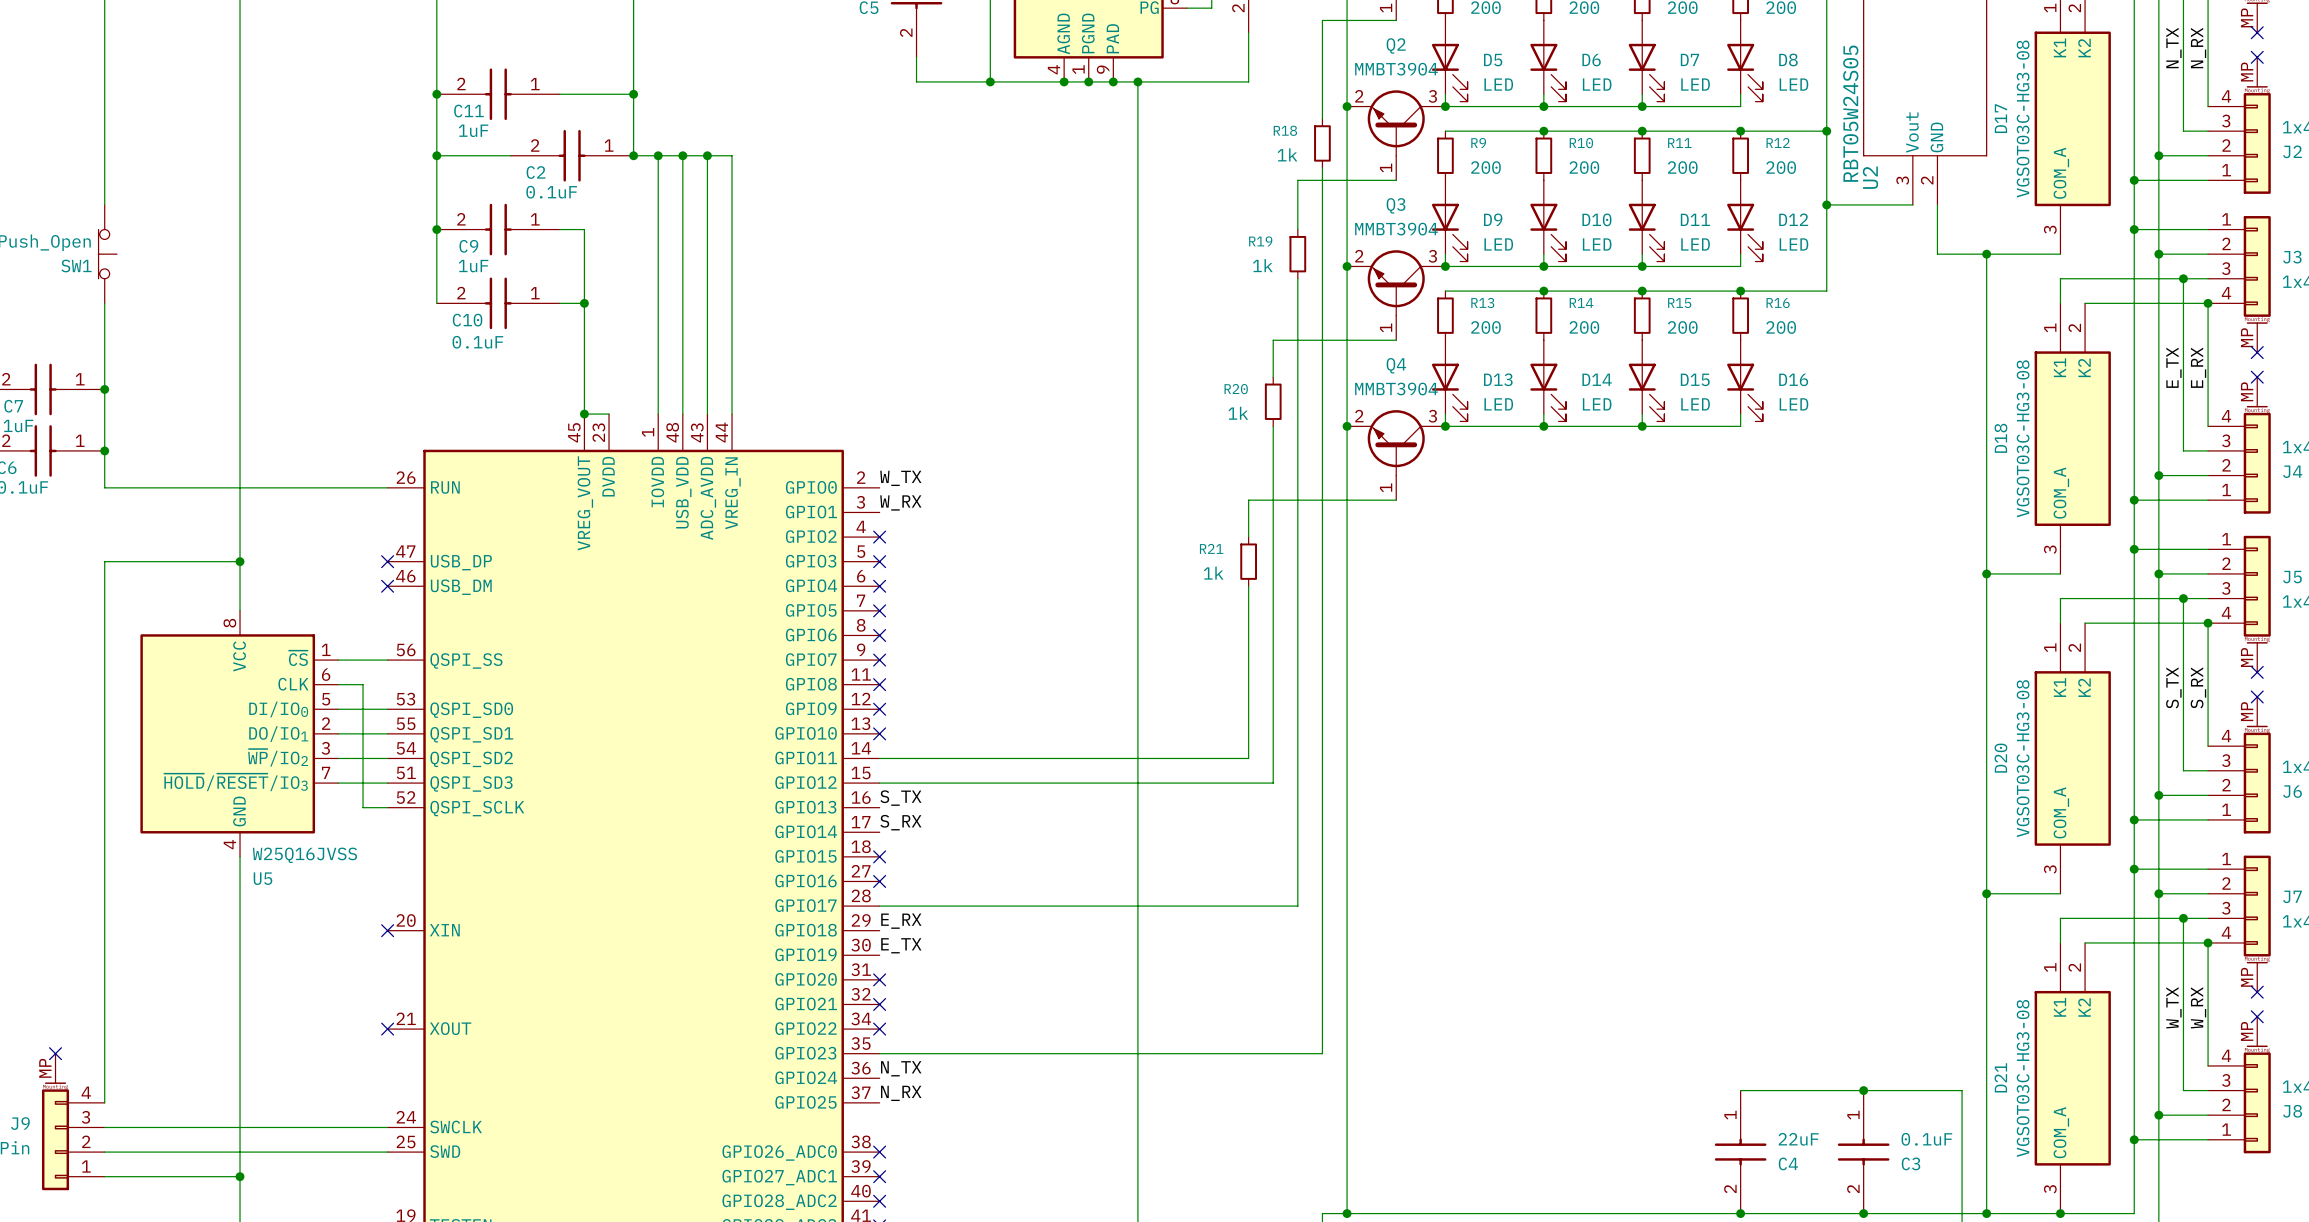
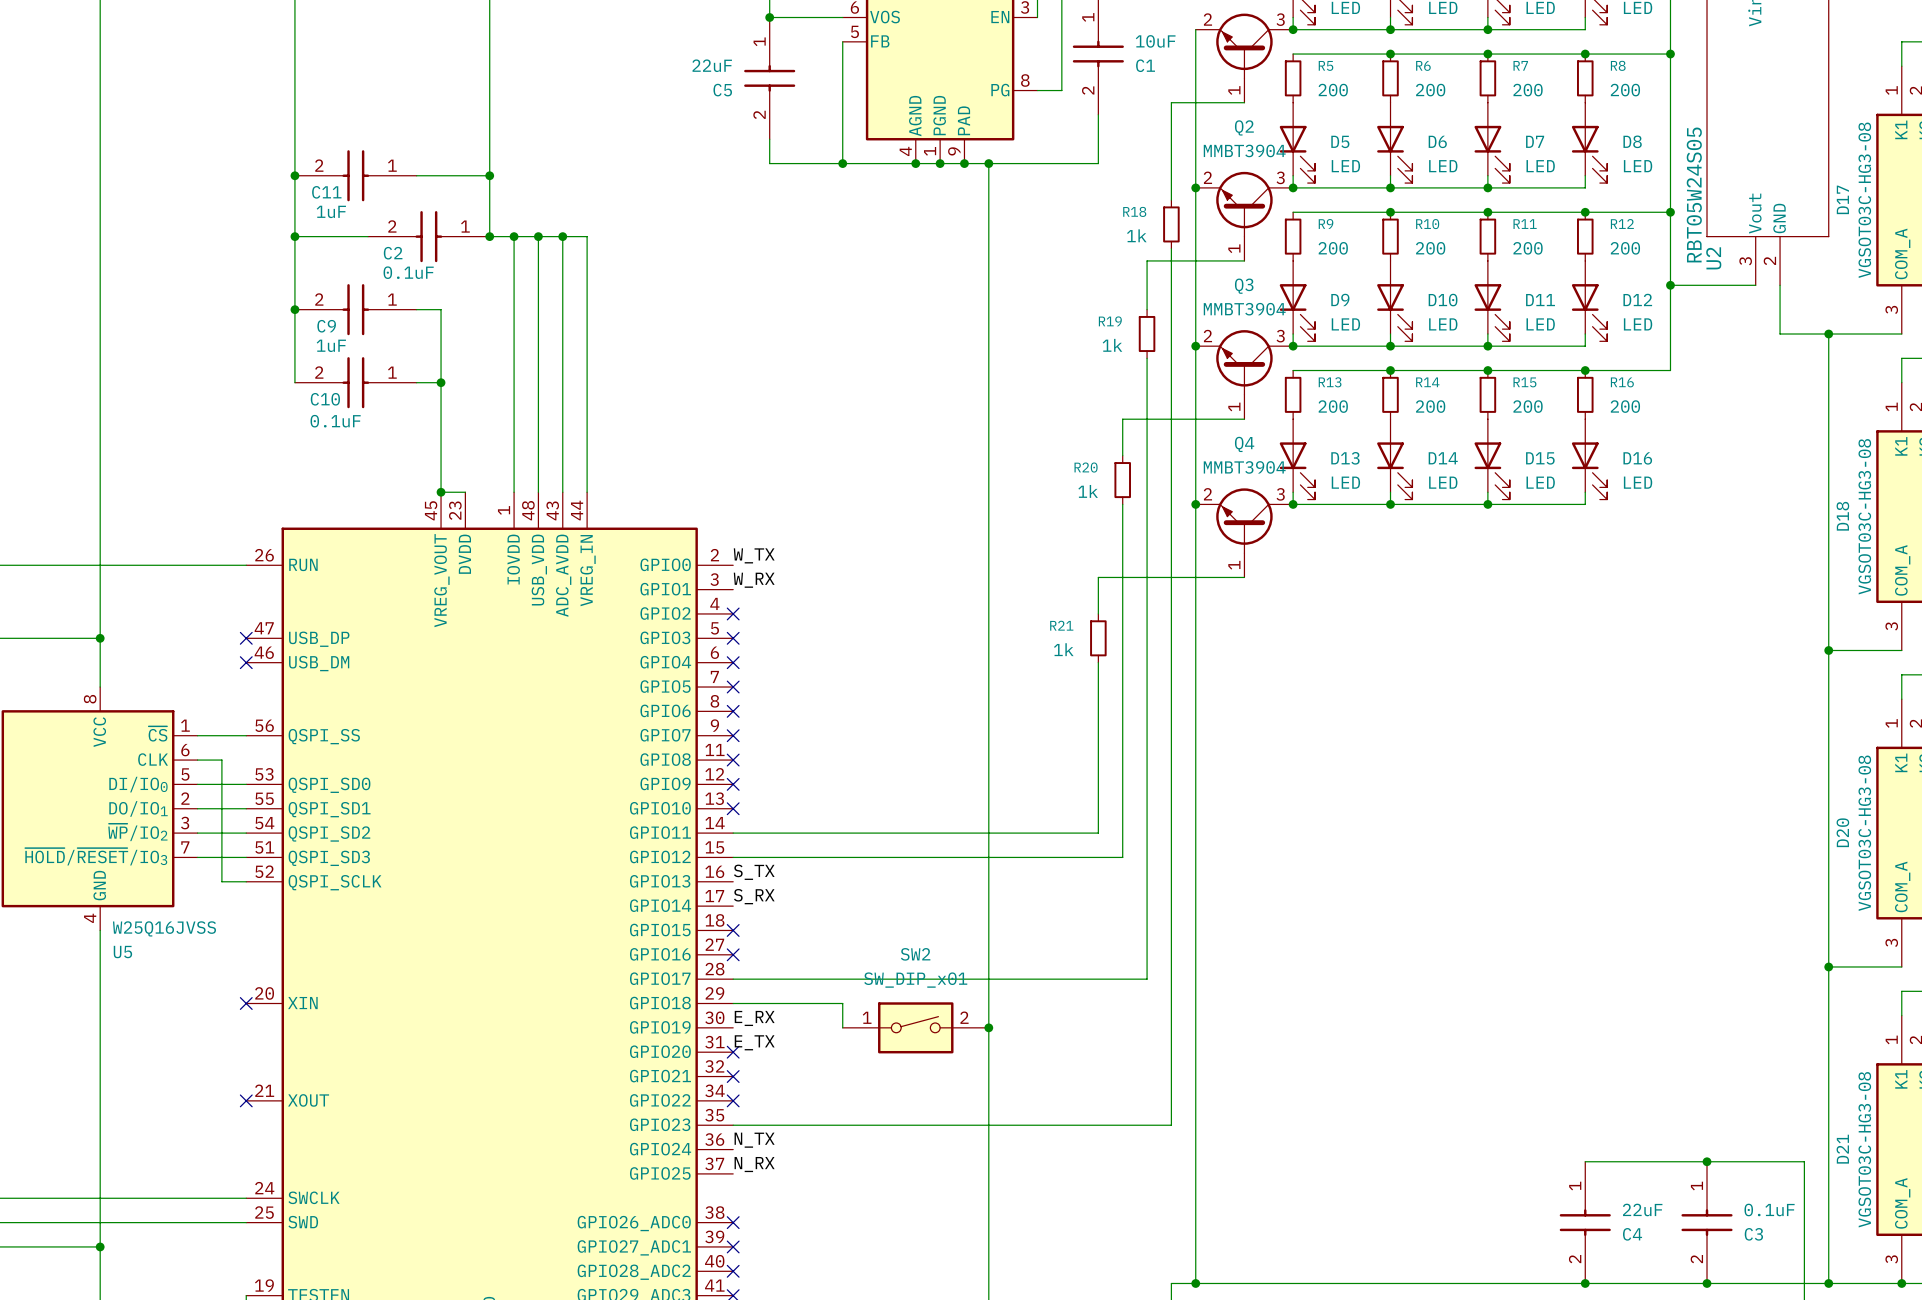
label: E_RX (901, 921) -> none
wire: none -> (733, 1003) (842, 1003) (842, 1027)
label: E_TX (901, 945) -> E_RX (754, 1018)
SW2: none -> SW_DIP_x01 (915, 1027)
junction: none -> (988, 1027)
label: none -> E_TX (754, 1042)

